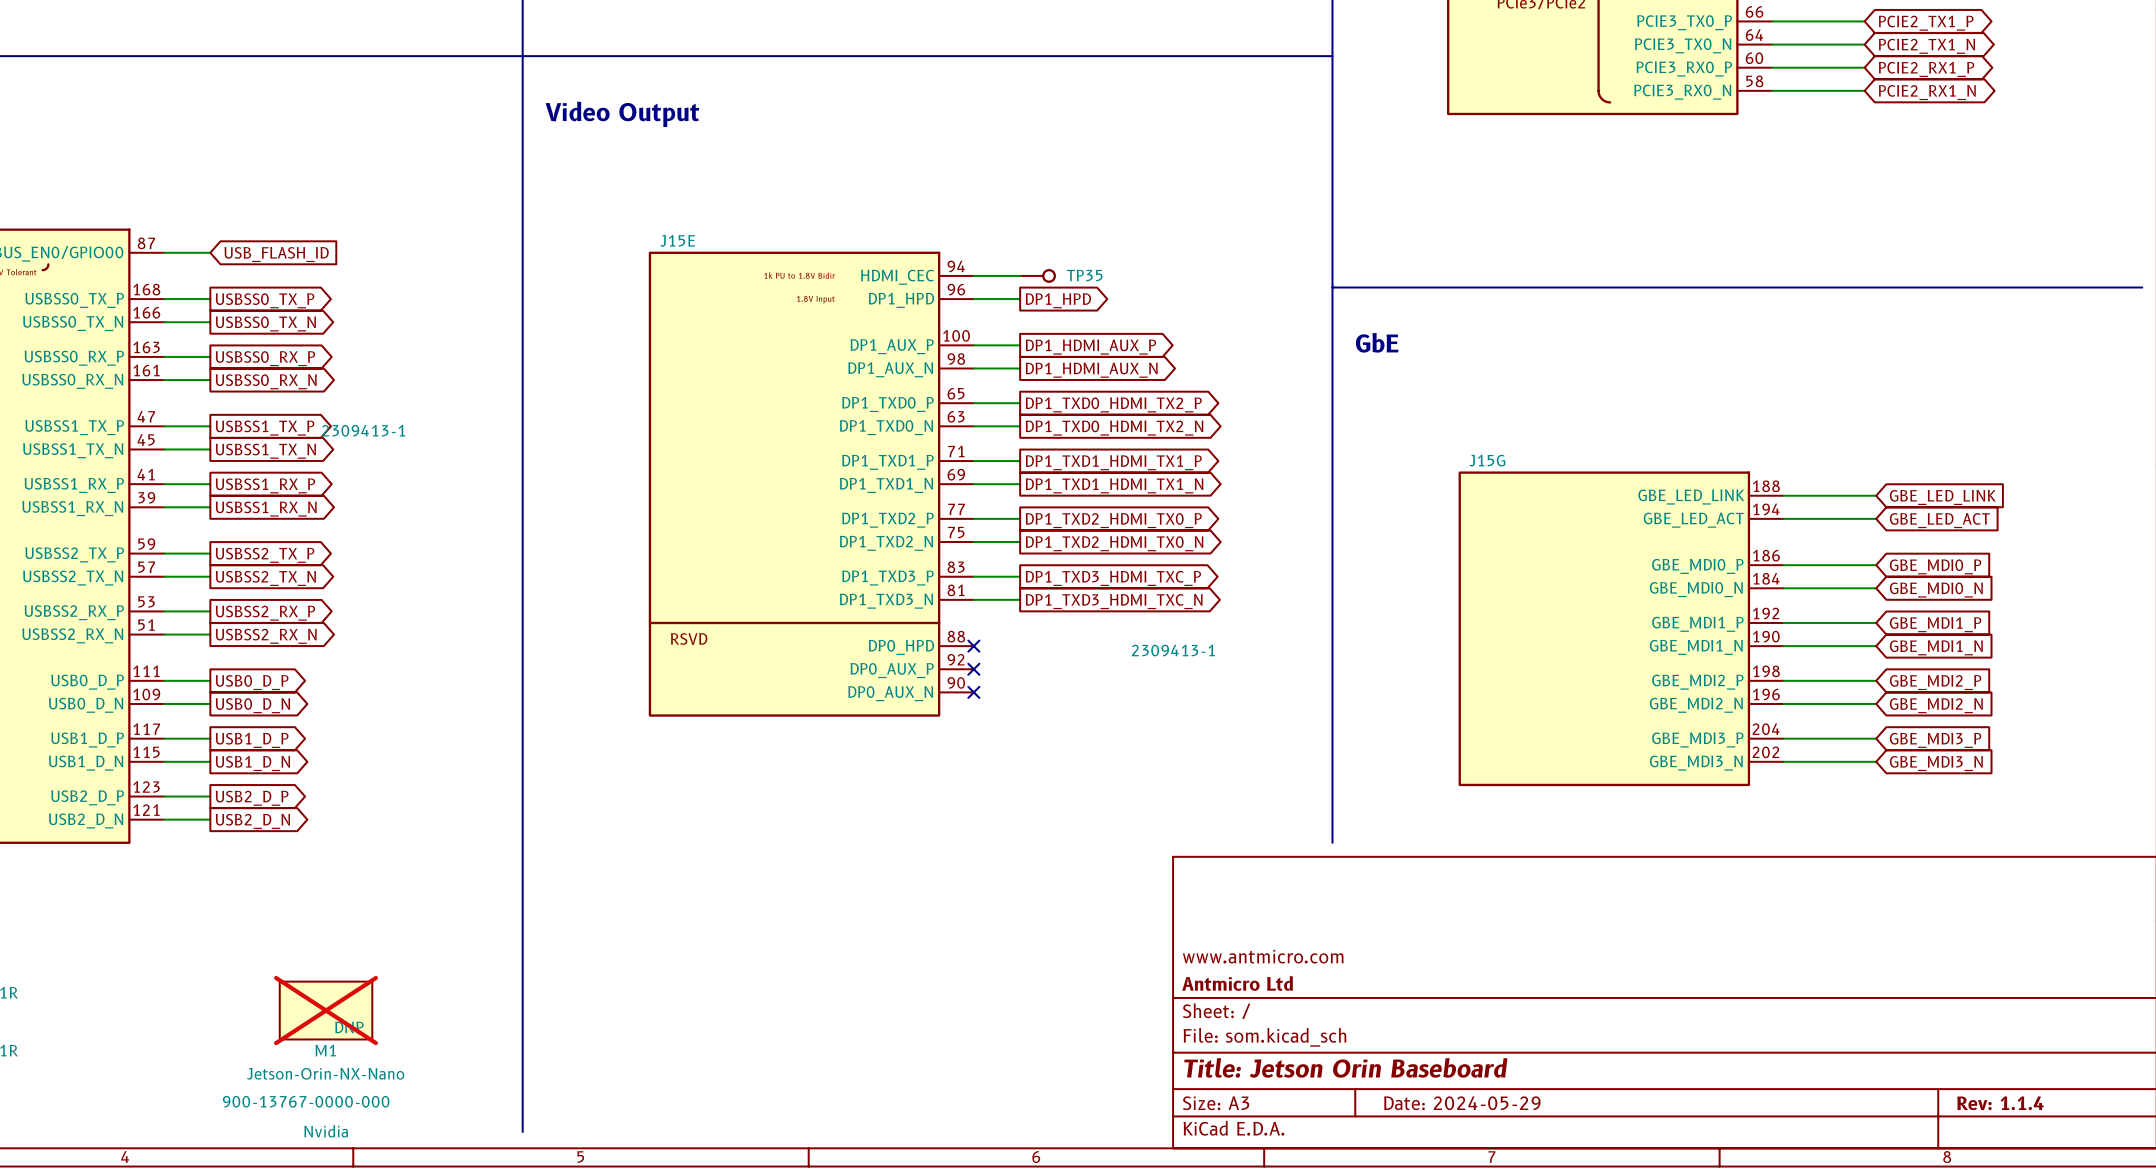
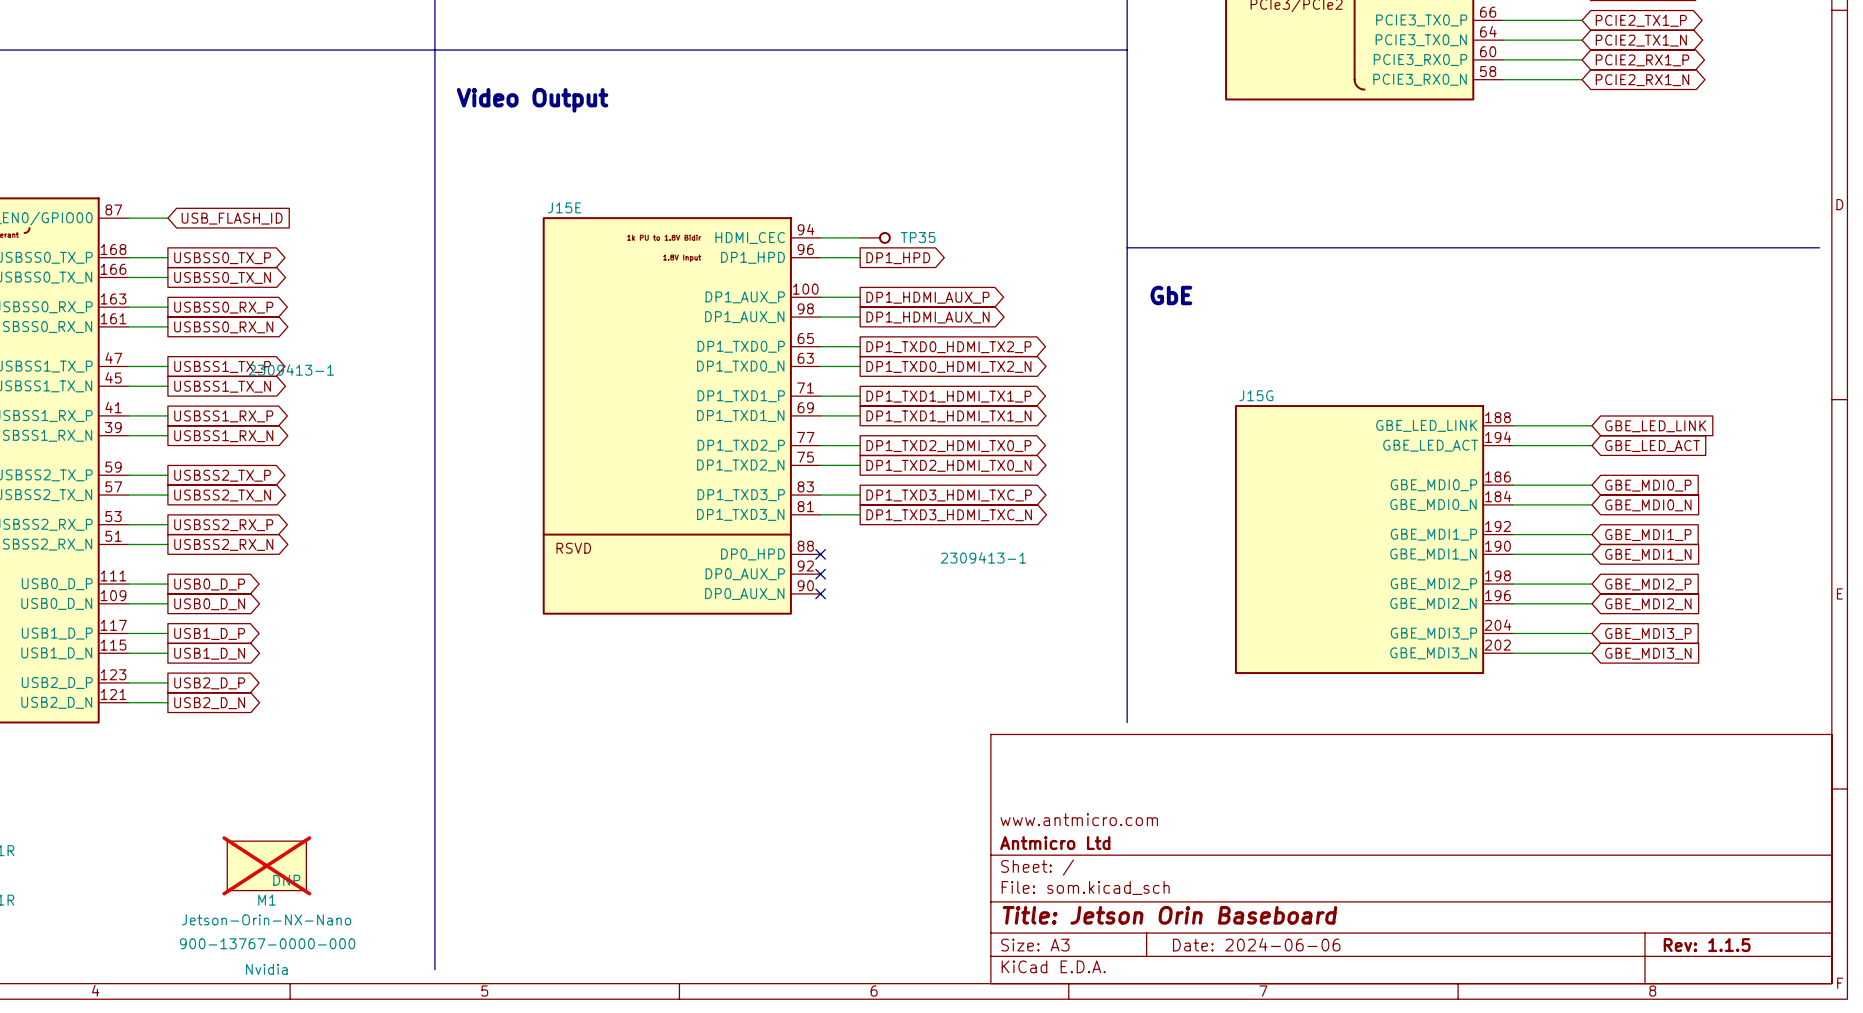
title block: Date: 2024-05-29 (1462, 1103) -> Date: 2024-06-06 (1256, 944)
title block: Rev: 1.1.4 (2000, 1103) -> Rev: 1.1.5 (1707, 945)

